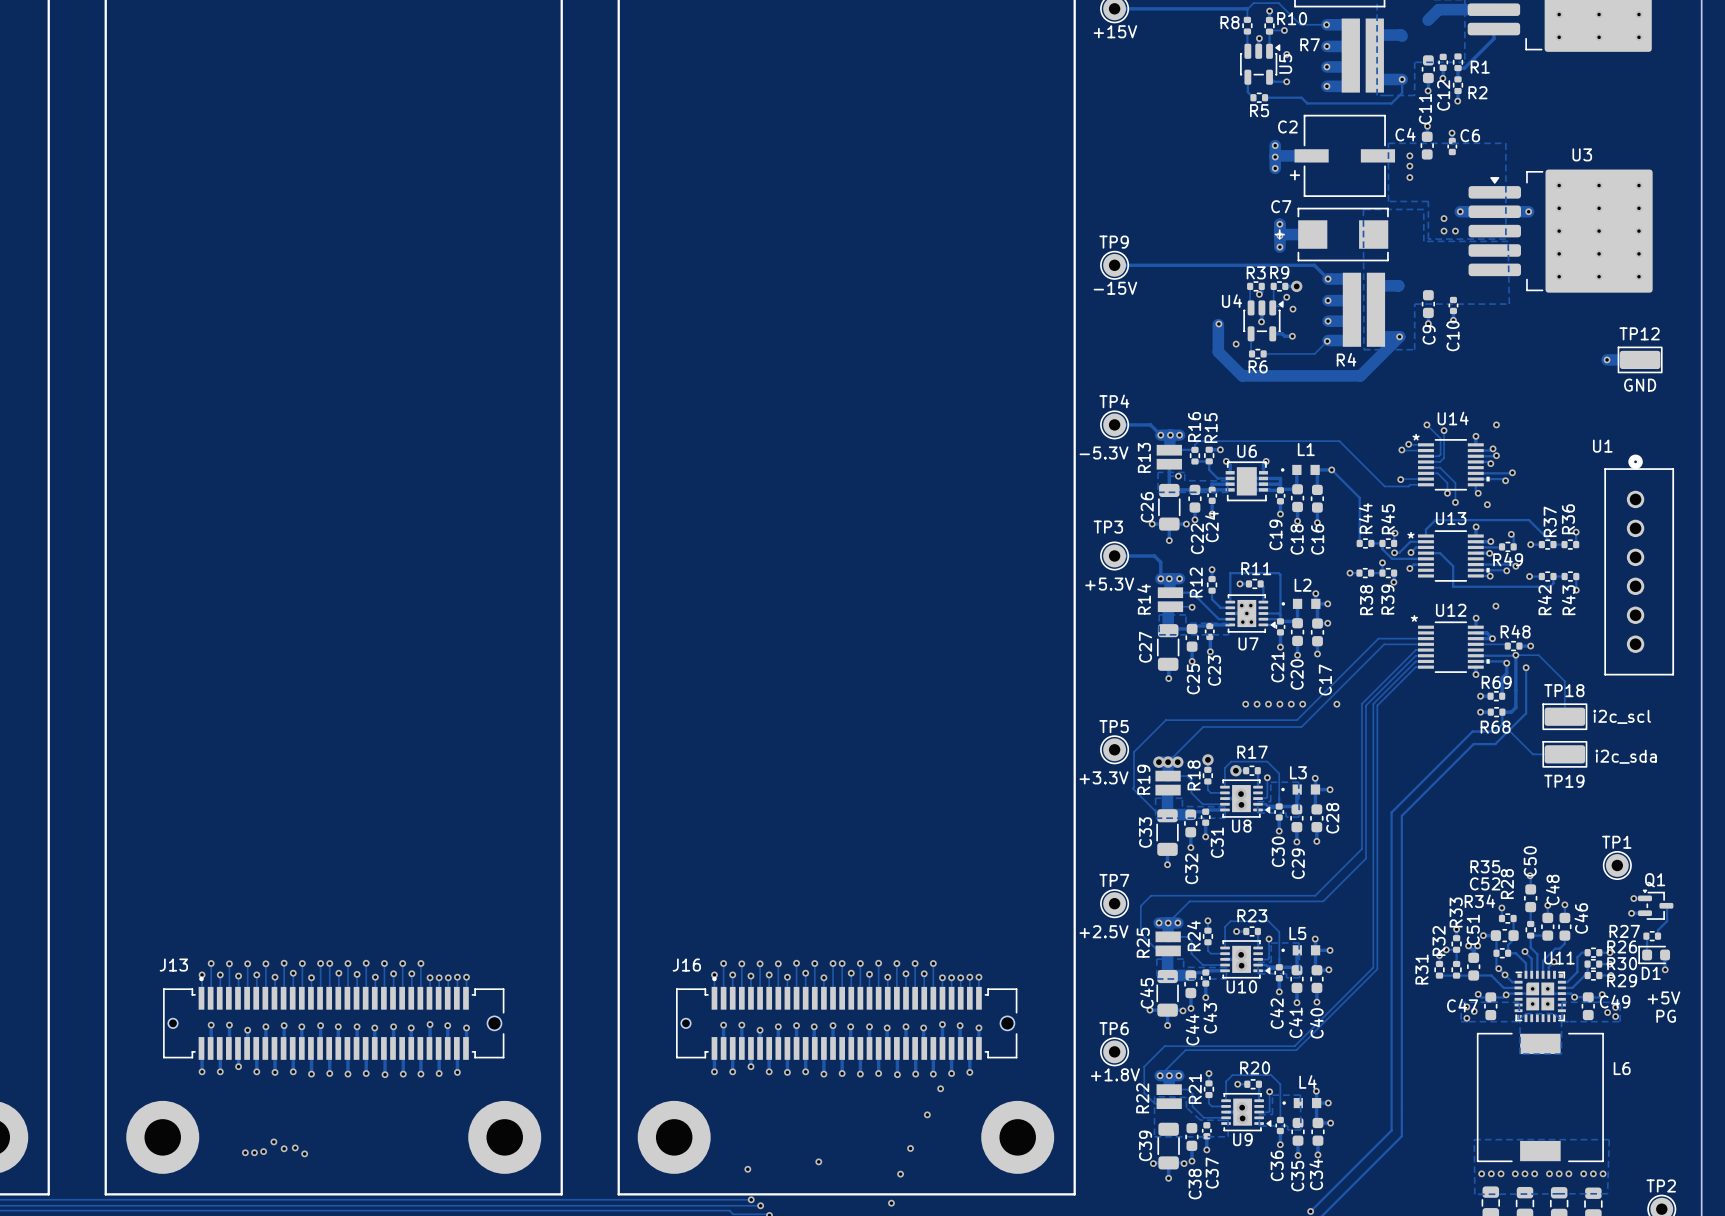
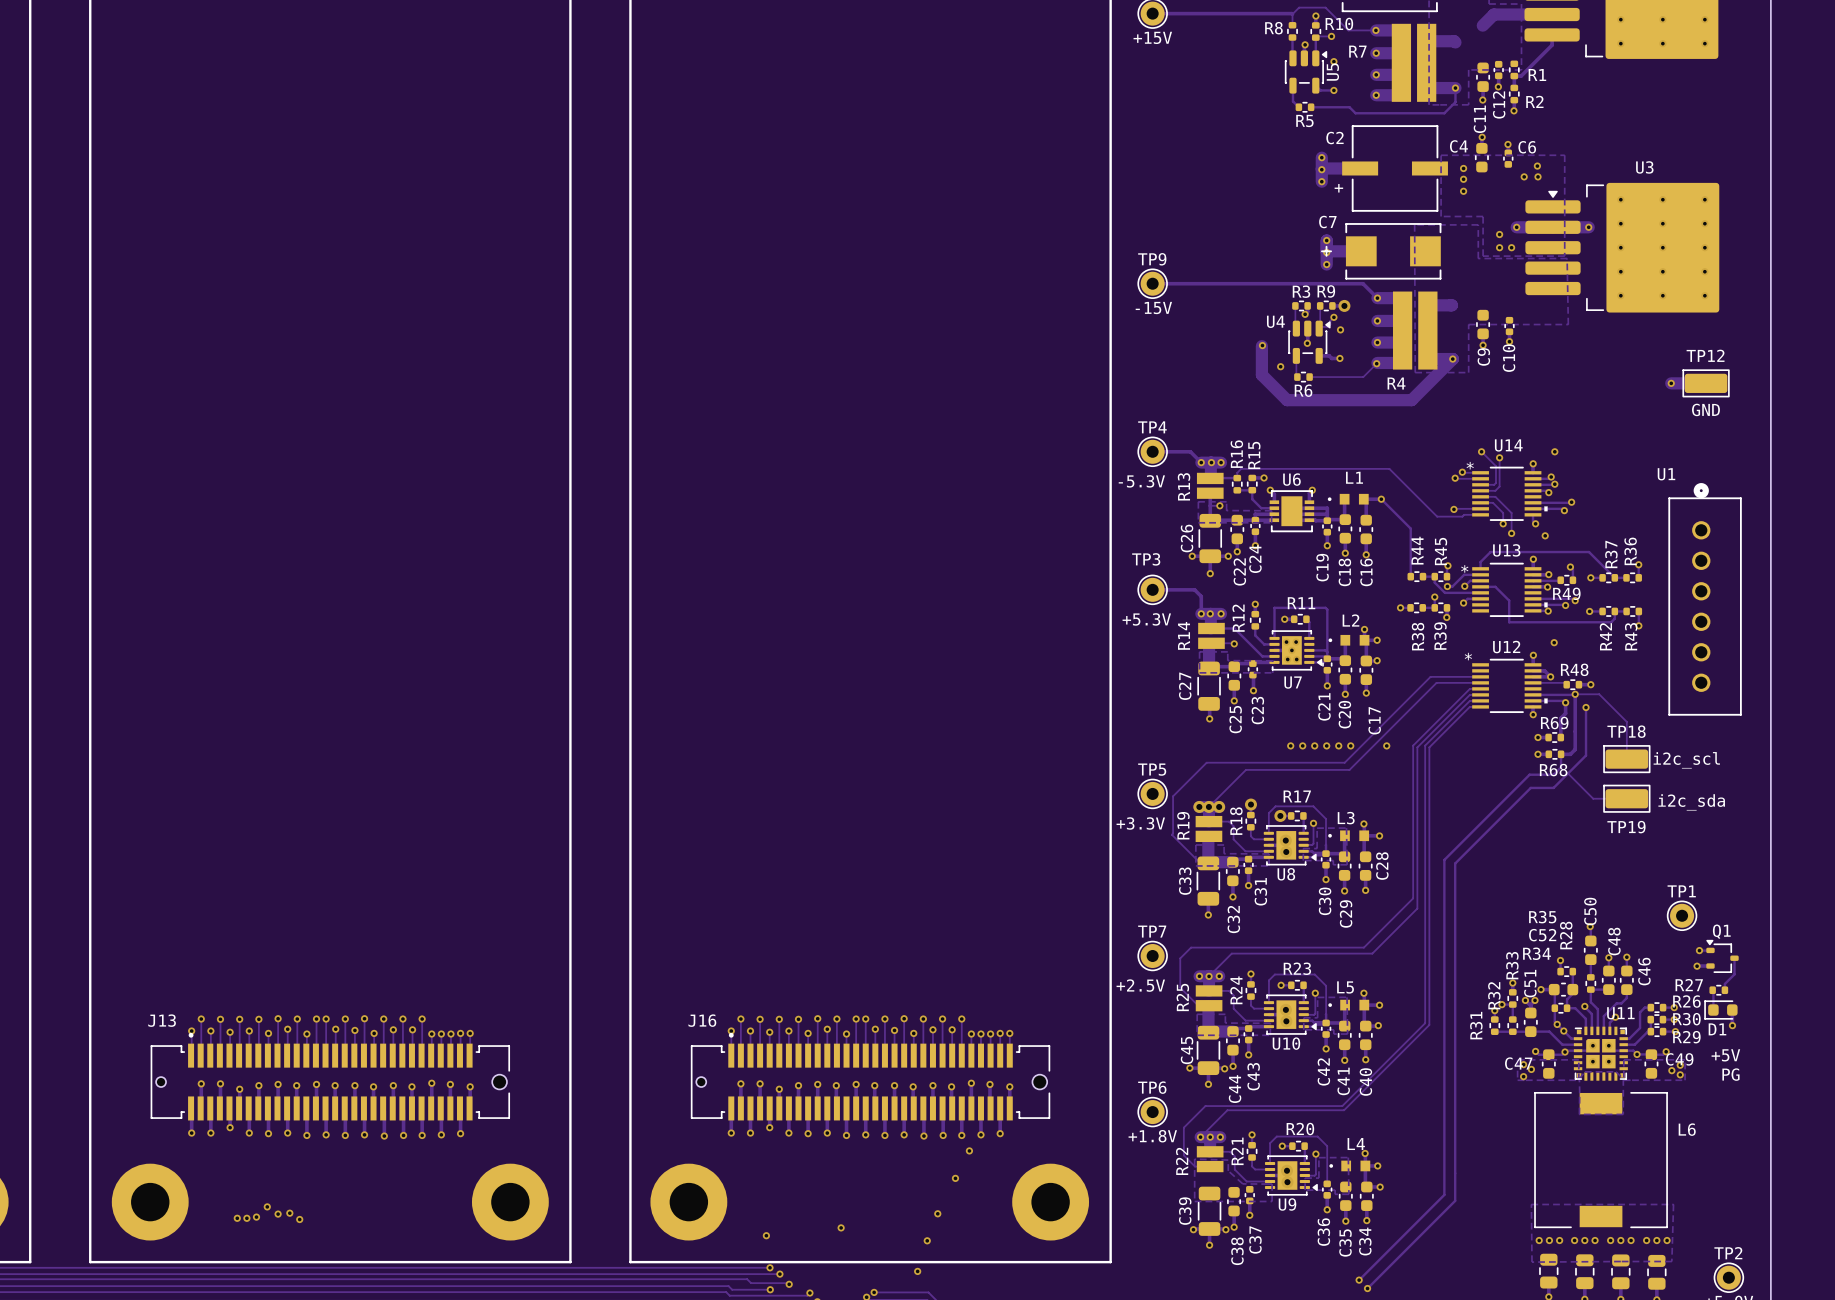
via: none -> (1537, 166)
via: none -> (1524, 176)
via: none -> (1538, 176)
Q1 footprint: [1638, 889, 1674, 920] -> [1706, 939, 1739, 973]

